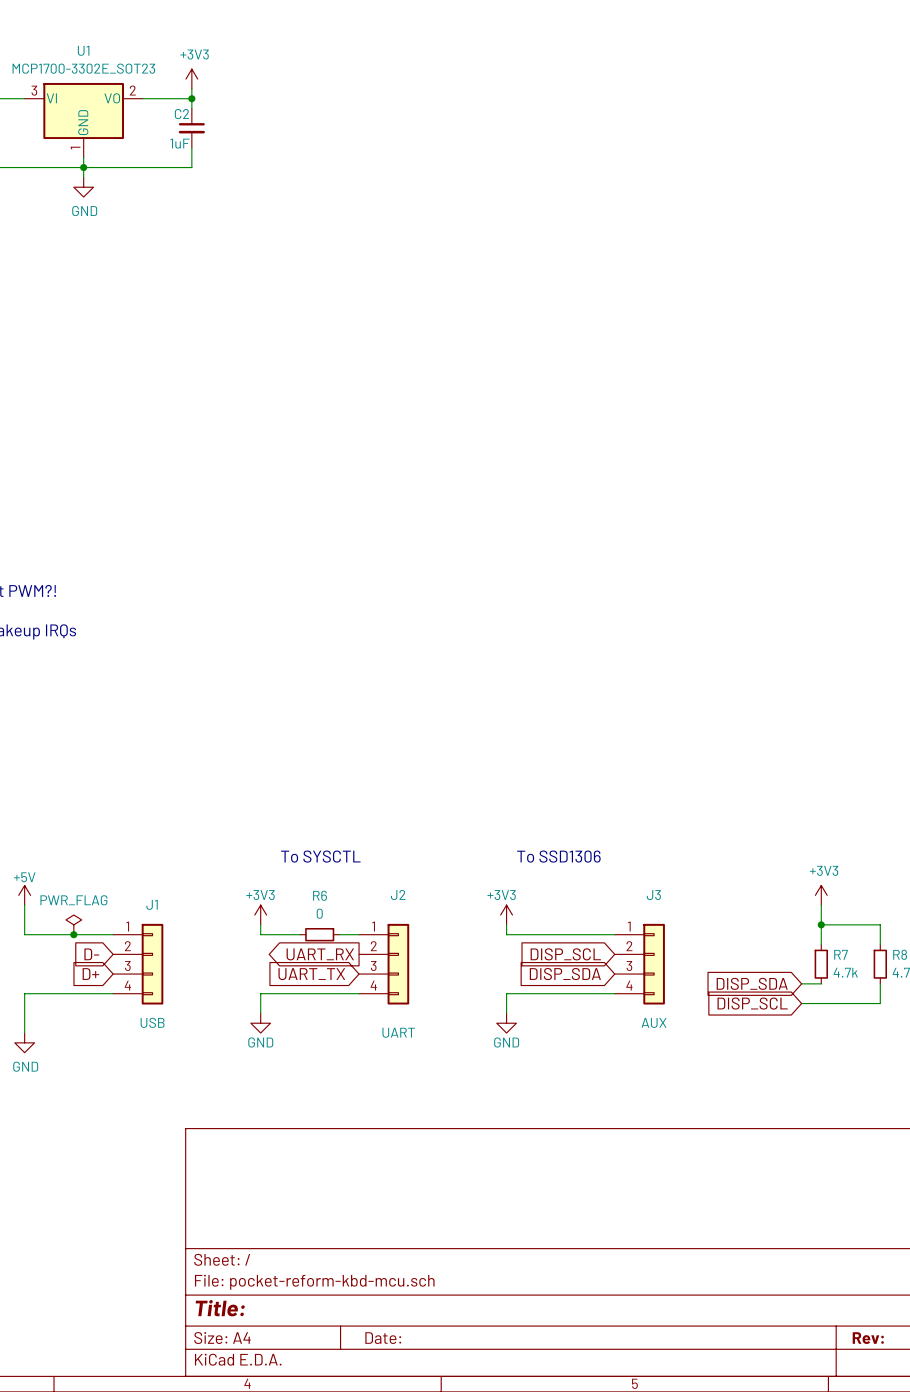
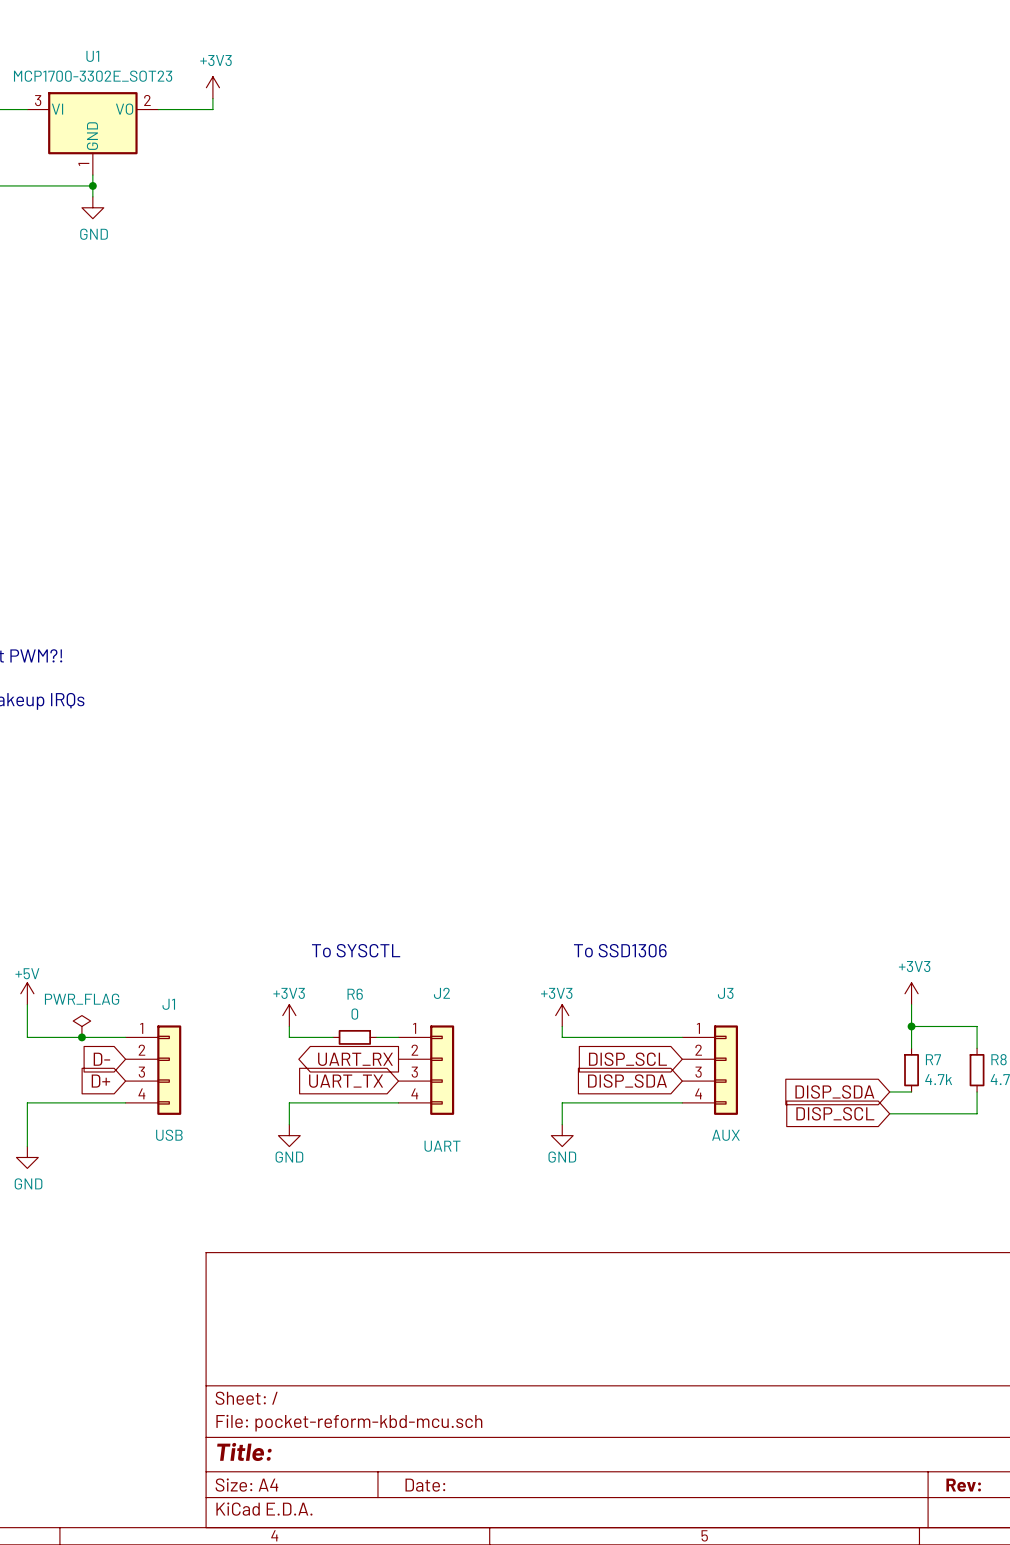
wire: (191, 98) (191, 108) -> none
junction: (191, 98) -> none
C2: 1uF (191, 128) -> none
wire: (191, 147) (191, 167) (83, 167) -> none

